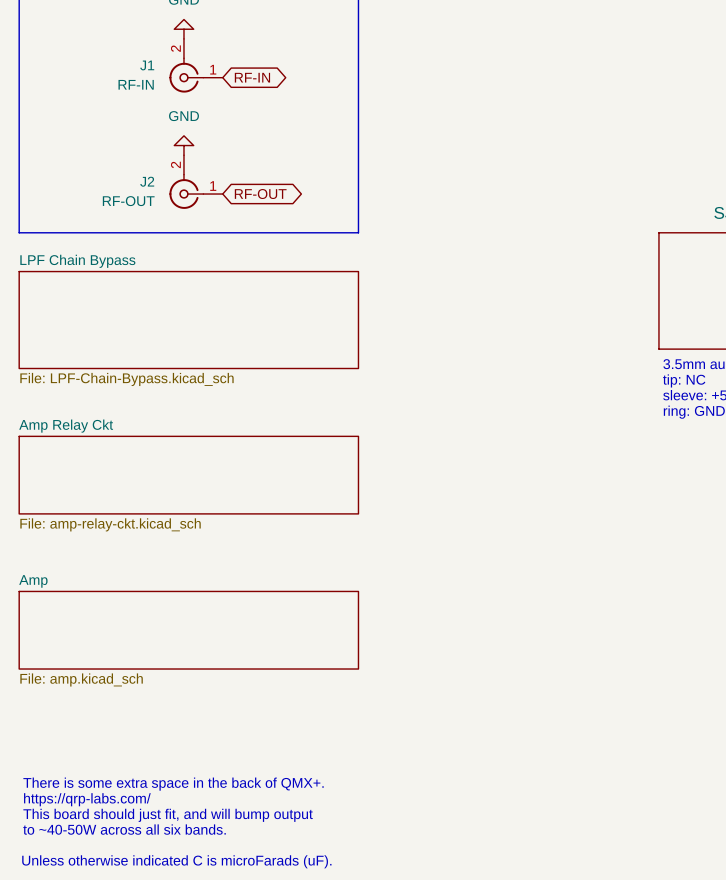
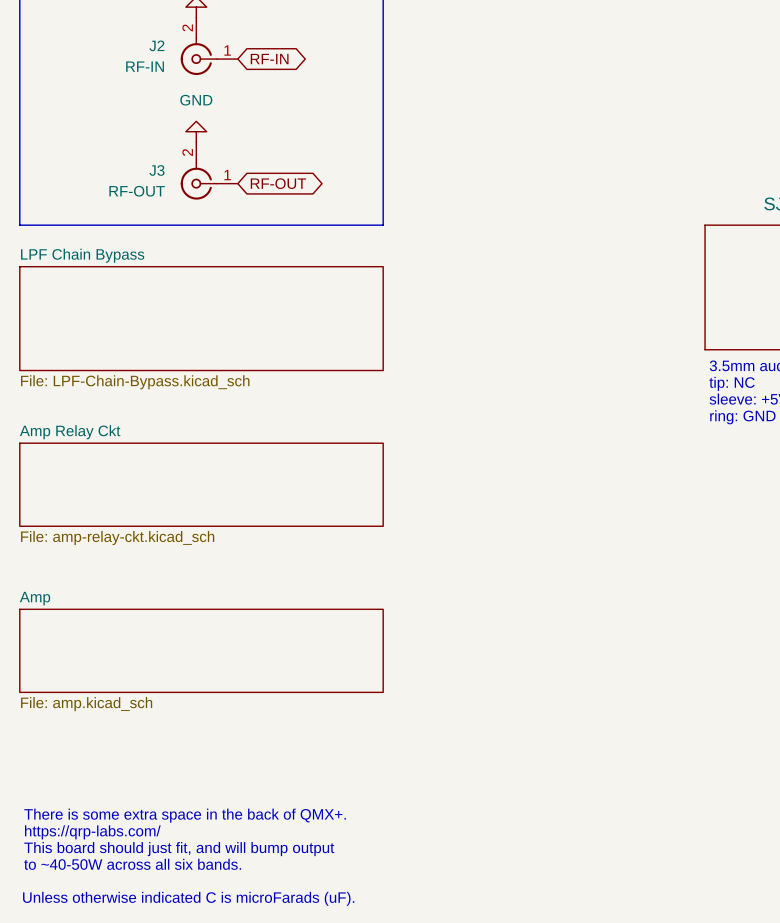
J1 name: J1 (147, 65) -> J2 (156, 45)
J2 name: J2 (147, 181) -> J3 (156, 170)

